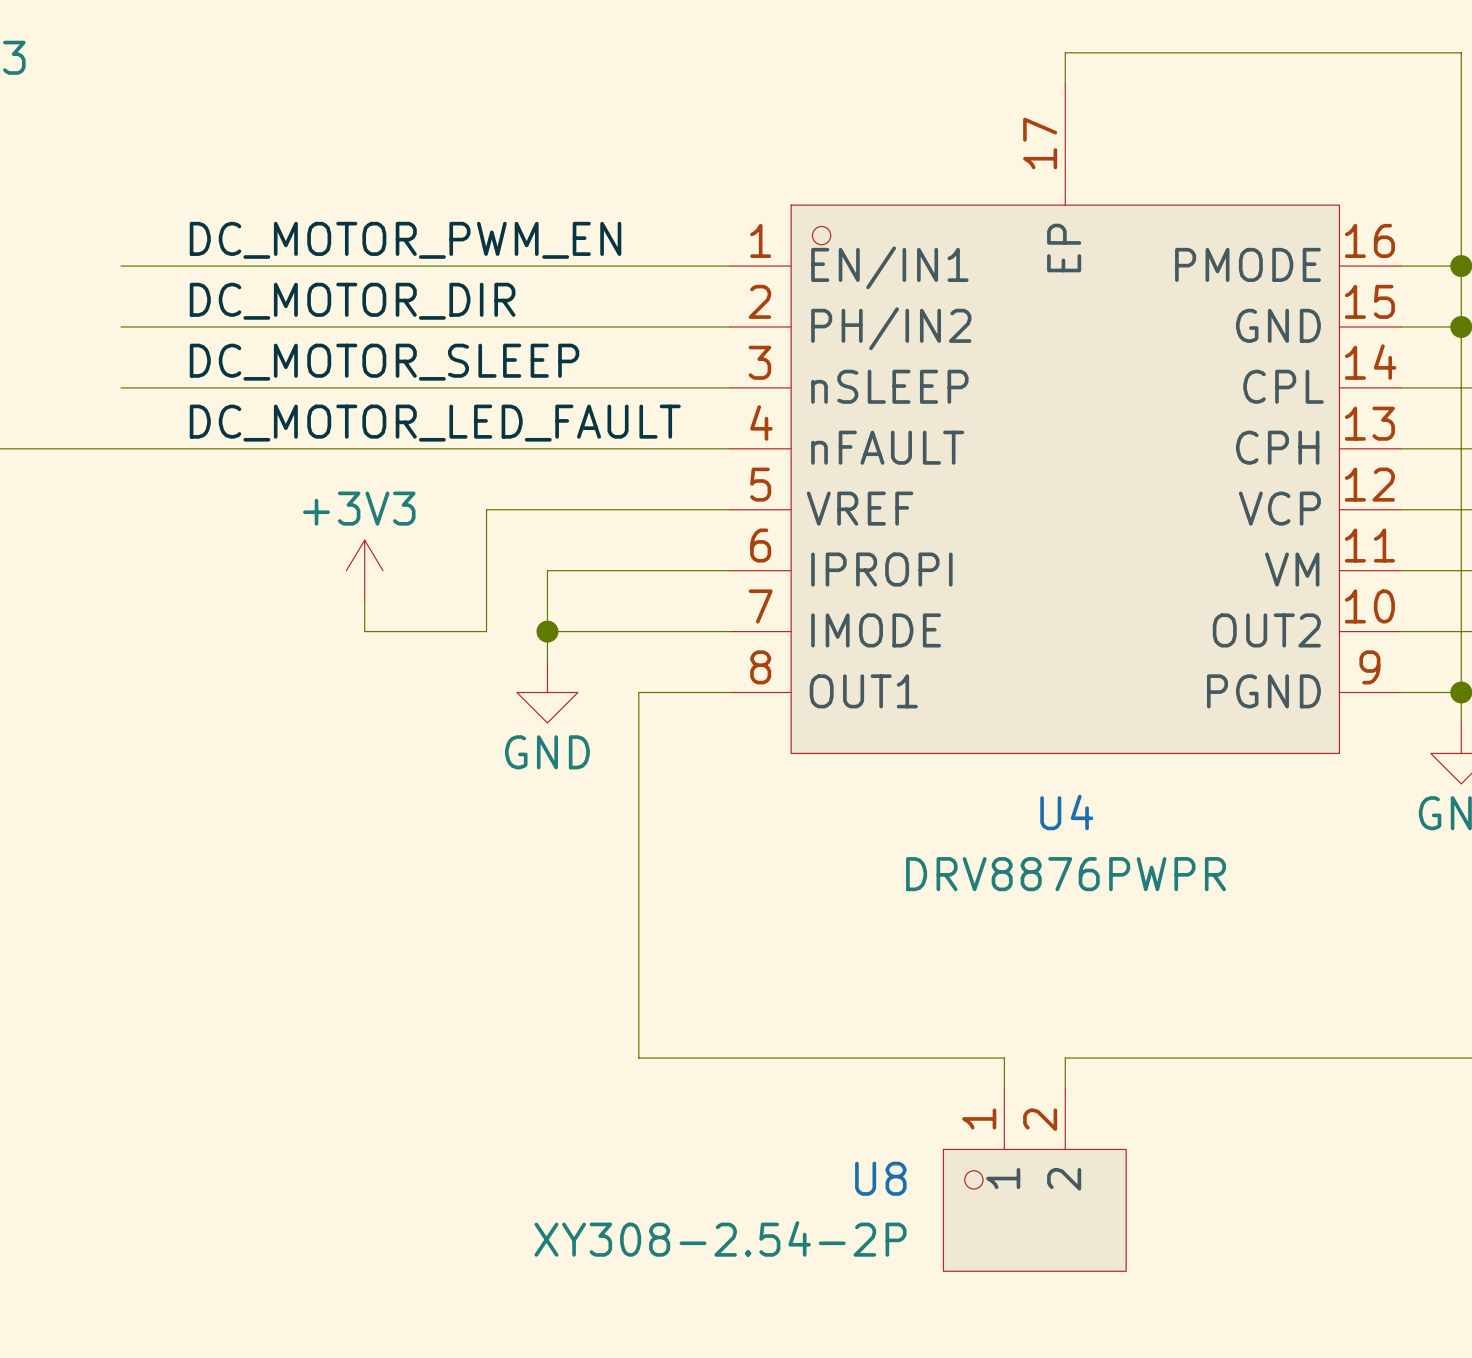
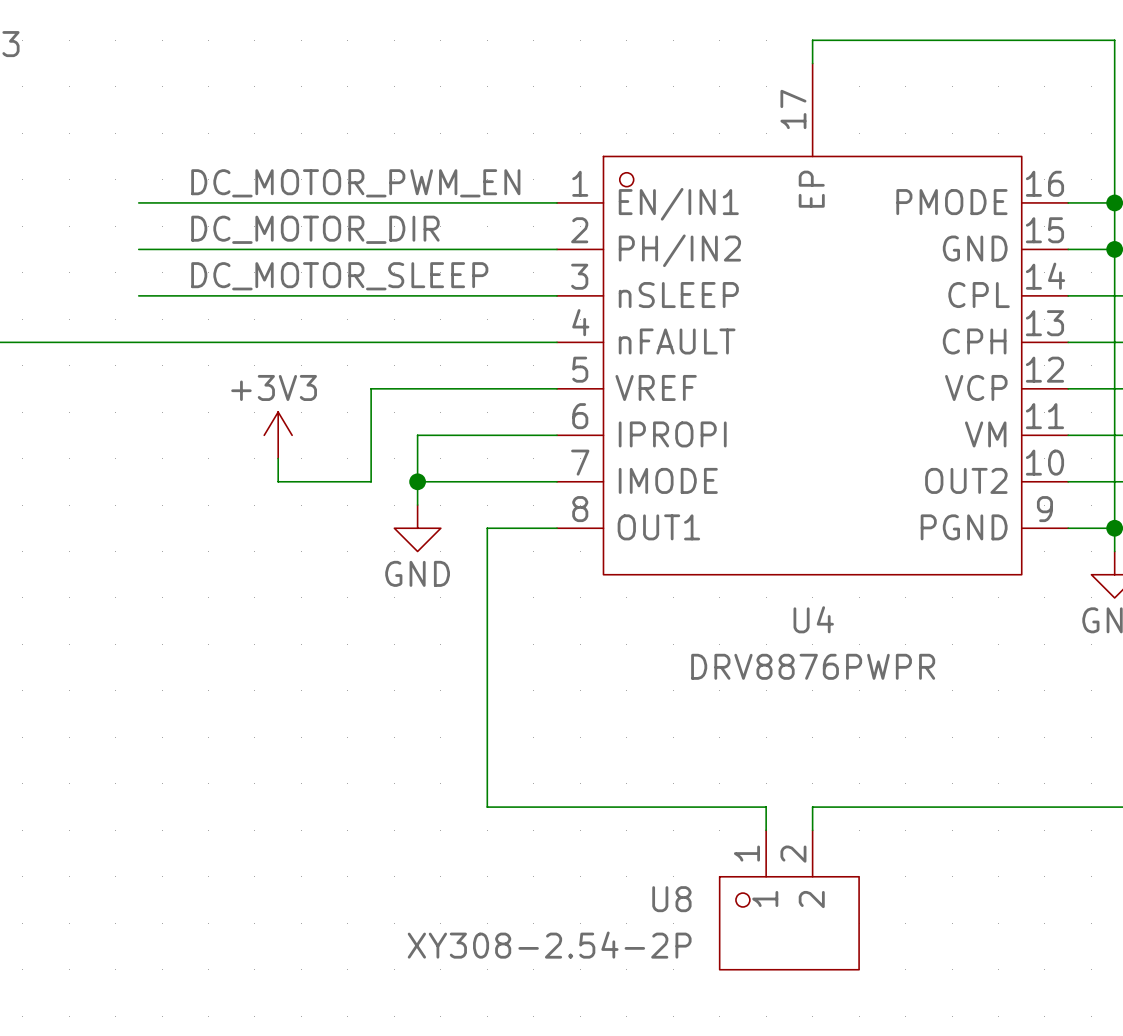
label position: DC_MOTOR_PWM_EN (405, 240) -> DC_MOTOR_PWM_EN (355, 183)
wire: (120, 266) (181, 266) -> none
label position: DC_MOTOR_DIR (352, 301) -> DC_MOTOR_DIR (315, 229)
wire: (120, 326) (181, 326) -> none
label position: DC_MOTOR_SLEEP (384, 362) -> DC_MOTOR_SLEEP (339, 276)
wire: (120, 387) (181, 387) -> none
label: DC_MOTOR_LED_FAULT (435, 423) -> none

